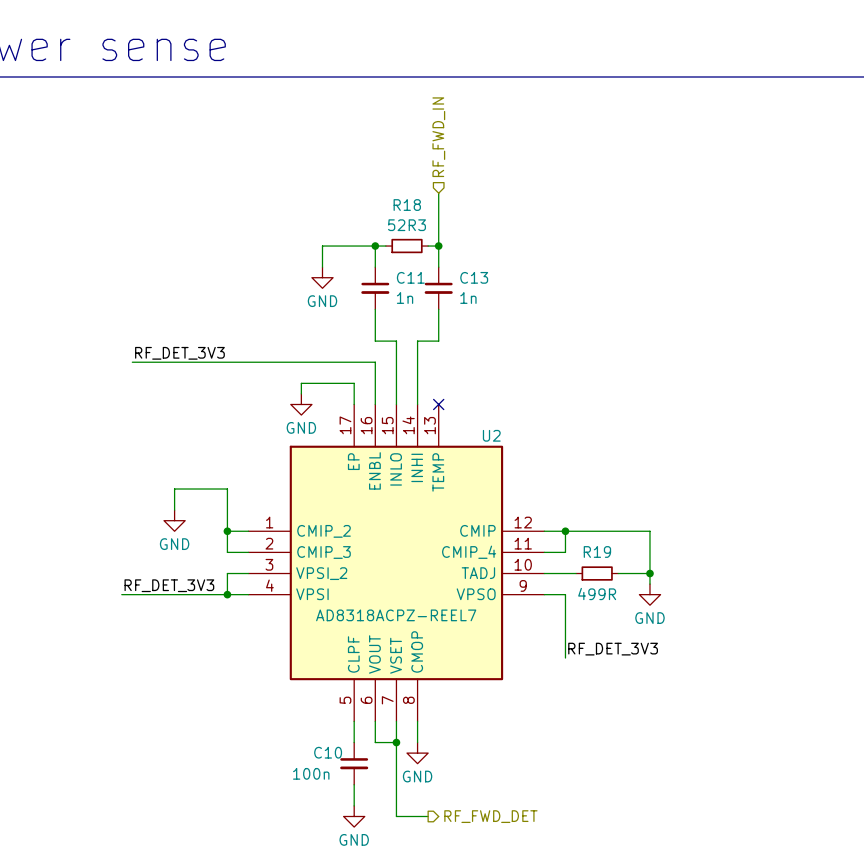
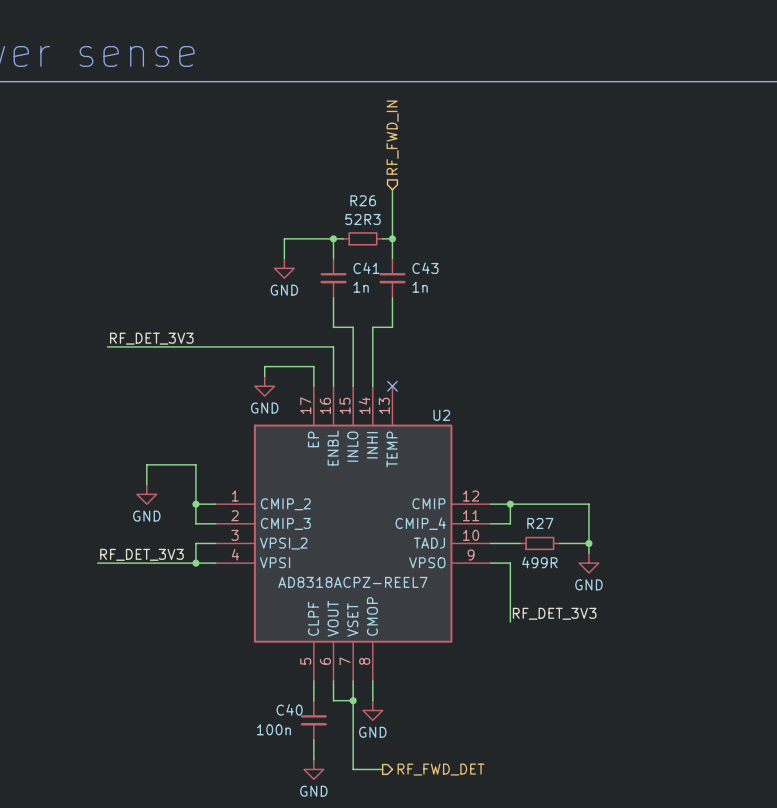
R18 name: R18 (407, 205) -> R26 (363, 200)
C11 name: C11 (410, 277) -> C41 (366, 268)
C13 name: C13 (474, 277) -> C43 (425, 268)
R19 name: R19 (597, 551) -> R27 (540, 523)
C10 name: C10 (328, 752) -> C40 (289, 709)

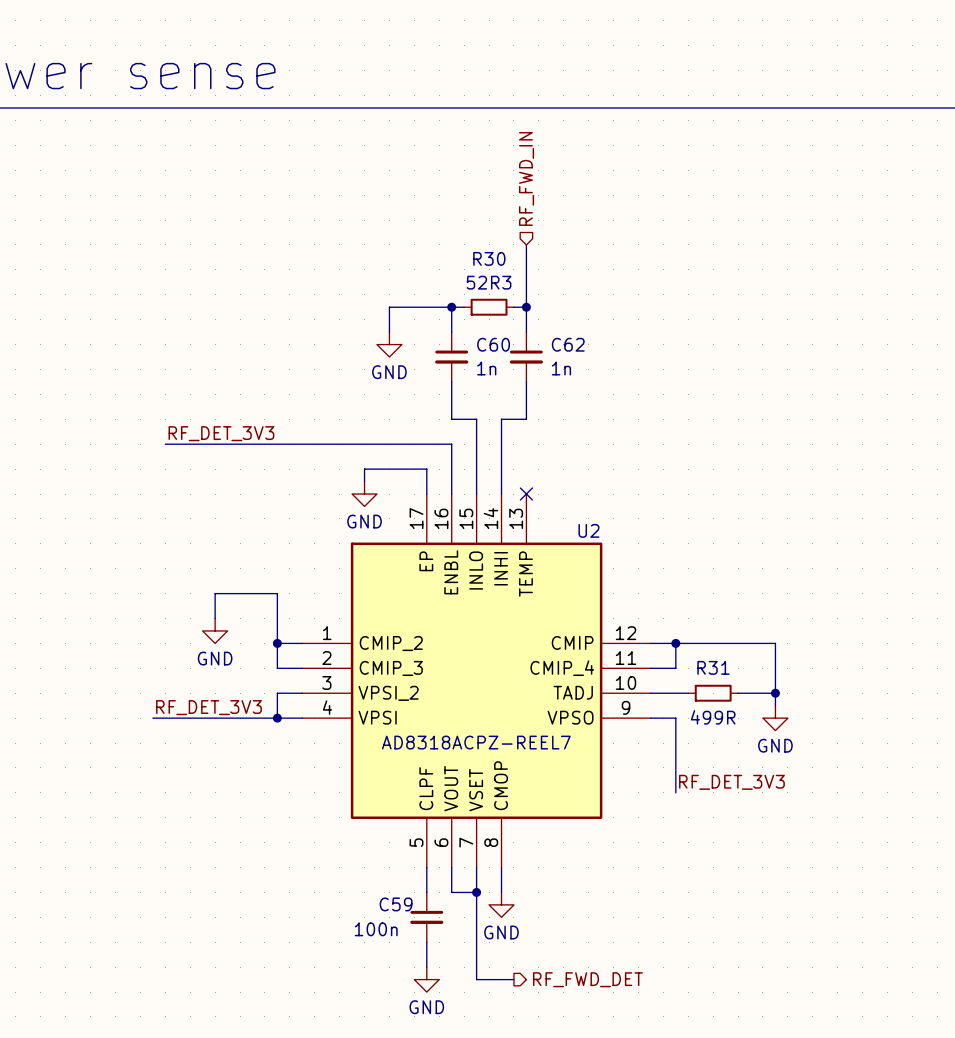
R26 name: R26 (363, 200) -> R30 (489, 258)
C41 name: C41 (366, 268) -> C60 (493, 344)
C43 name: C43 (425, 268) -> C62 (568, 344)
R27 name: R27 (540, 523) -> R31 (713, 667)
C40 name: C40 (289, 709) -> C59 (396, 904)

